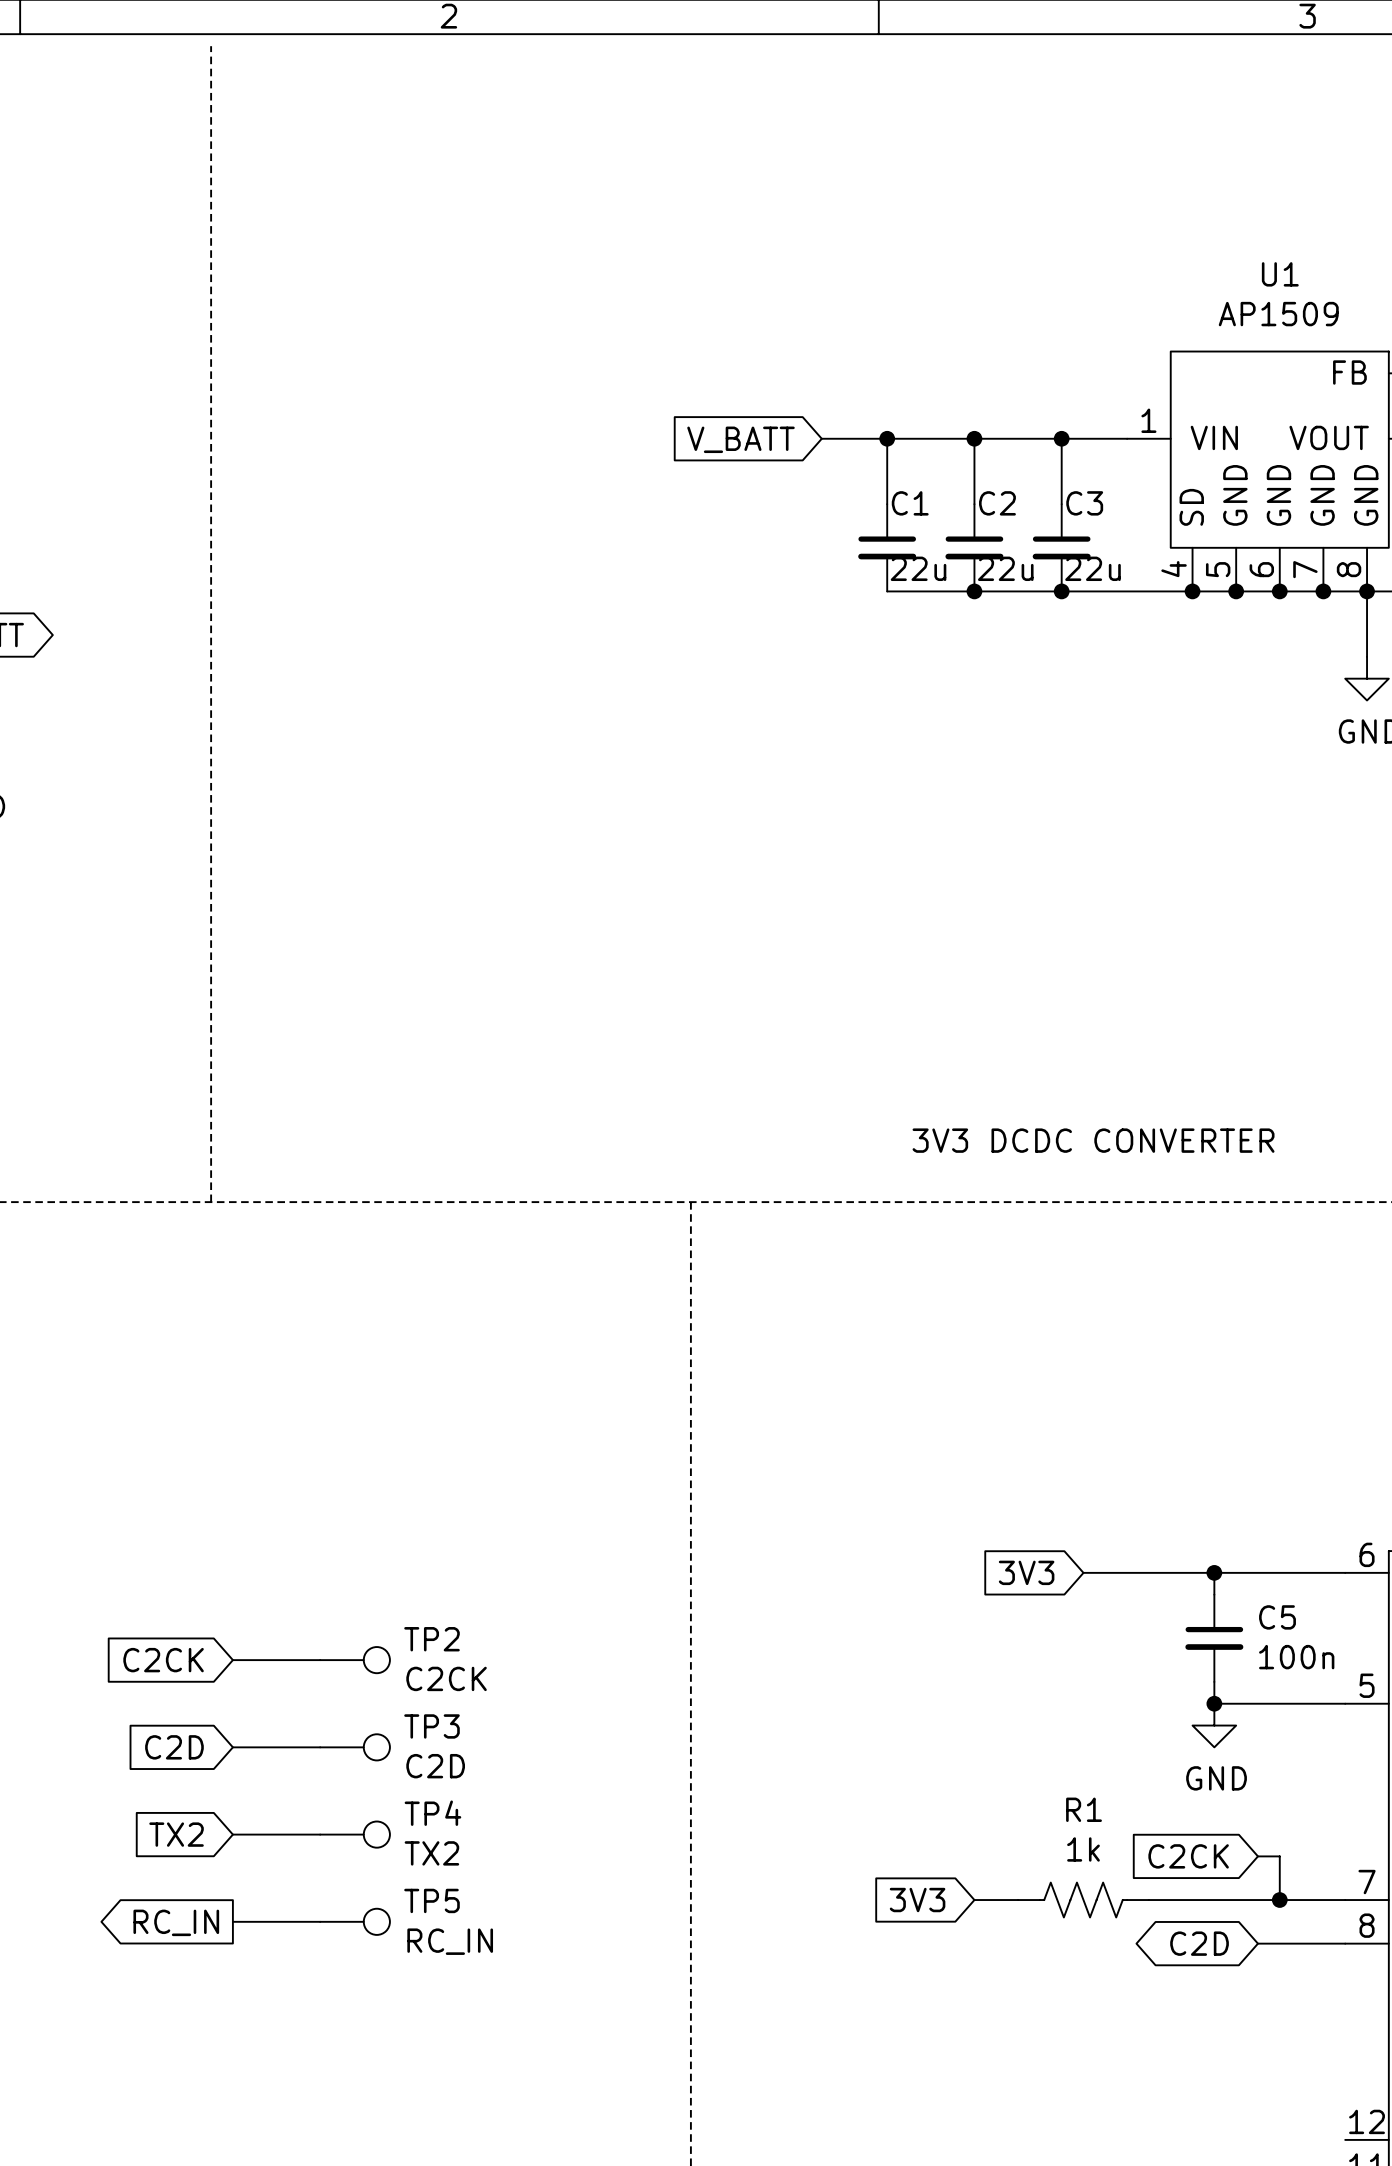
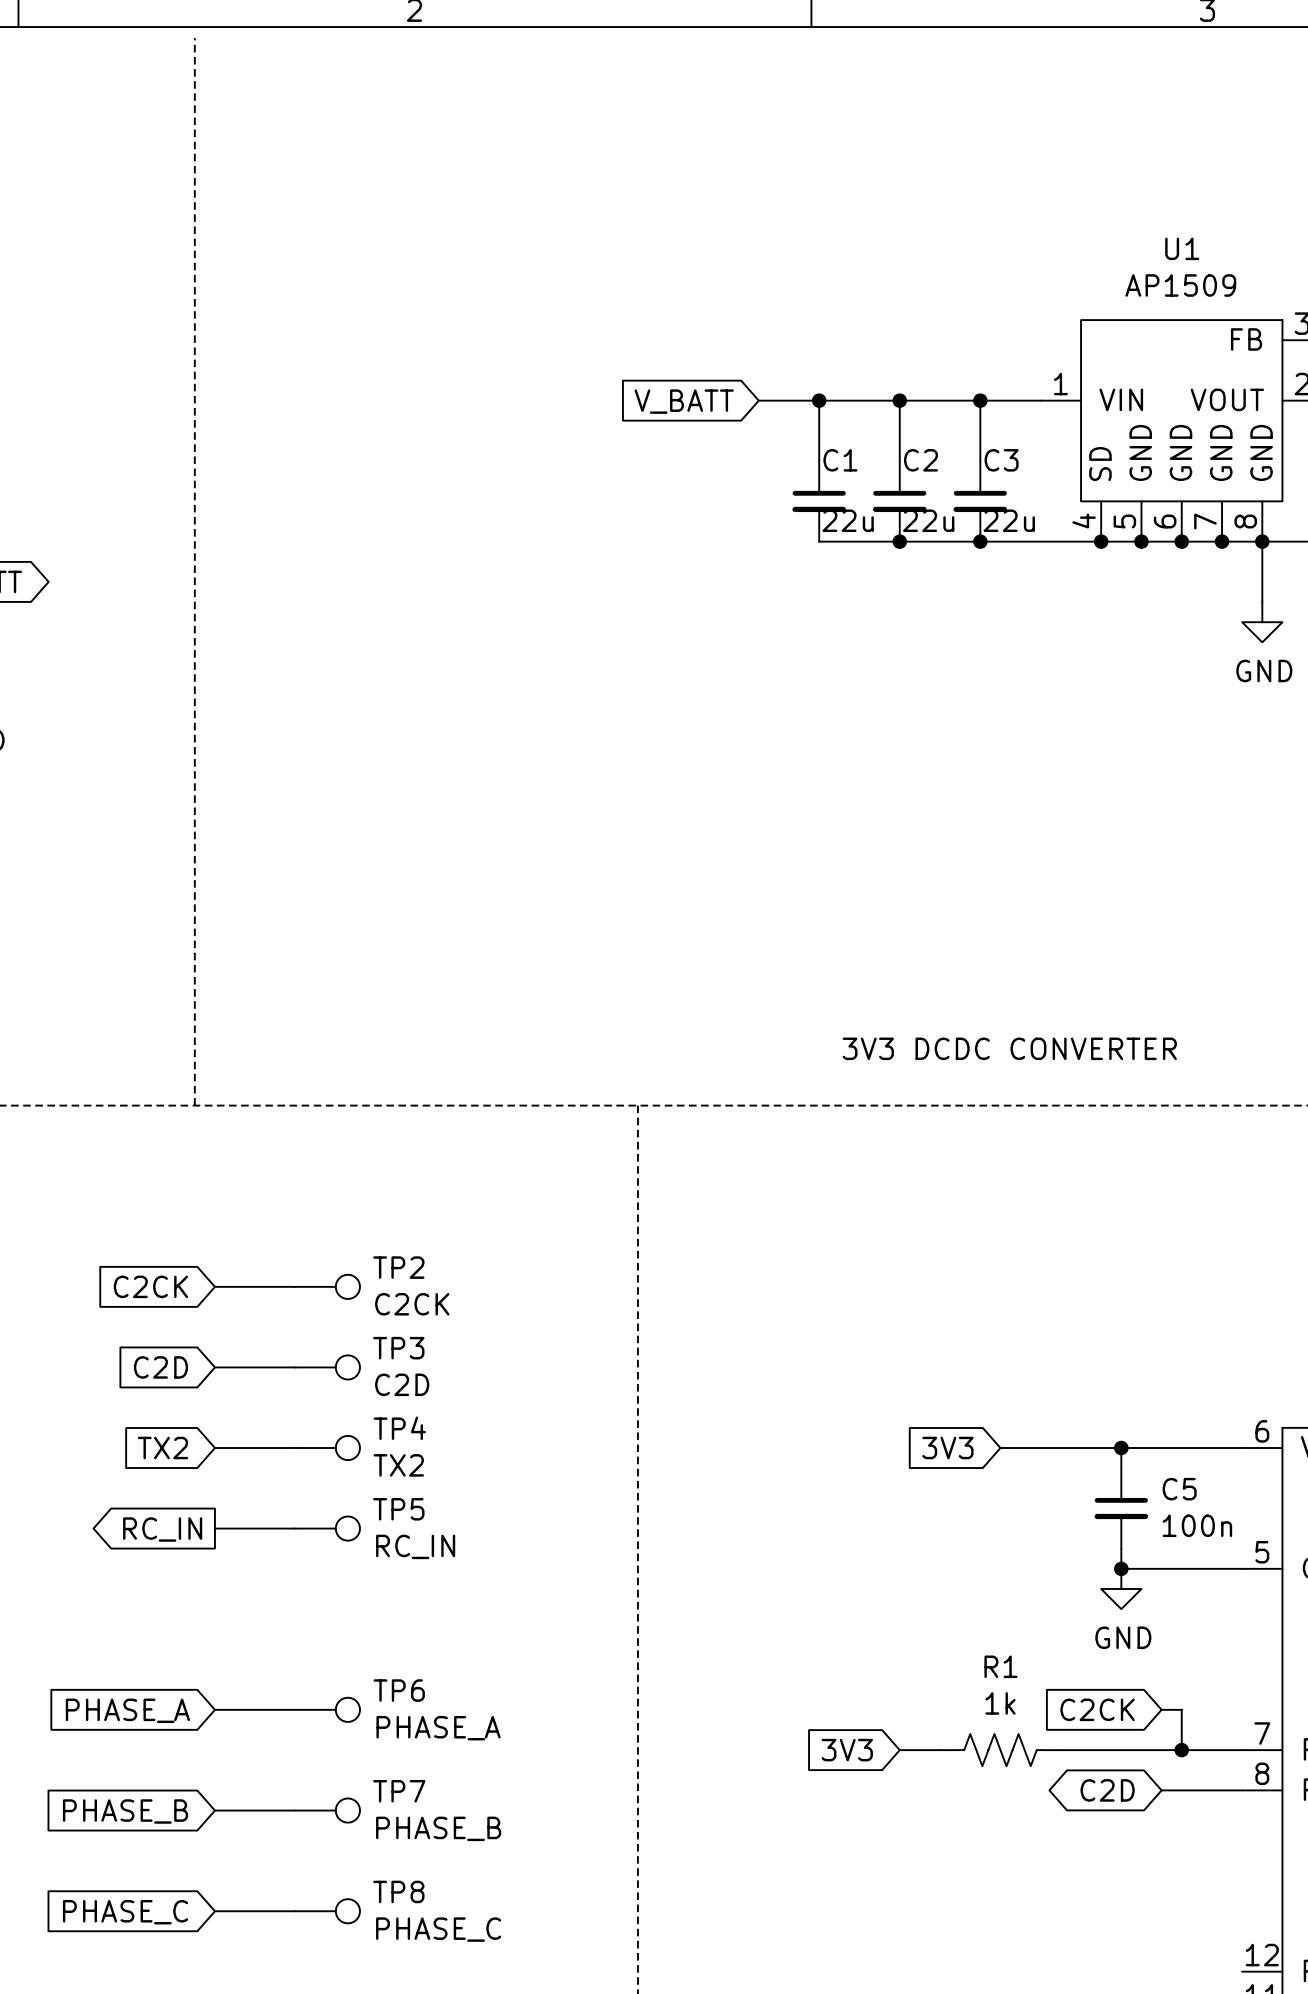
global label: none -> C2CK (150, 1286)
TP2: none -> C2CK (327, 1286)
TP2 name: TP2 (432, 1639) -> TP5 (398, 1509)
global label shape: input (163, 1660) -> output (162, 1529)
global label: C2CK (163, 1660) -> RC_IN (162, 1529)
TP2 value: C2CK (446, 1678) -> RC_IN (415, 1546)
global label position: C2D (174, 1747) -> C2D (160, 1367)
wire: (232, 1747) (320, 1747) -> (214, 1286) (295, 1286)
TP3 position: (355, 1747) -> (327, 1367)
global label position: TX2 (176, 1834) -> TX2 (162, 1448)
wire: (232, 1834) (320, 1834) -> (214, 1367) (295, 1367)
TP4 position: (355, 1834) -> (327, 1448)
wire: none -> (214, 1709) (295, 1709)
TP6: none -> PHASE_A (327, 1709)
global label: none -> PHASE_A (127, 1710)
wire: (232, 1921) (320, 1921) -> (214, 1448) (295, 1448)
TP5: RC_IN (355, 1921) -> none
global label: RC_IN (176, 1922) -> none
wire: none -> (214, 1810) (295, 1810)
TP7: none -> PHASE_B (327, 1810)
global label: none -> PHASE_B (125, 1811)
wire: none -> (214, 1911) (295, 1911)
TP8: none -> PHASE_C (327, 1911)
global label: none -> PHASE_C (125, 1912)

